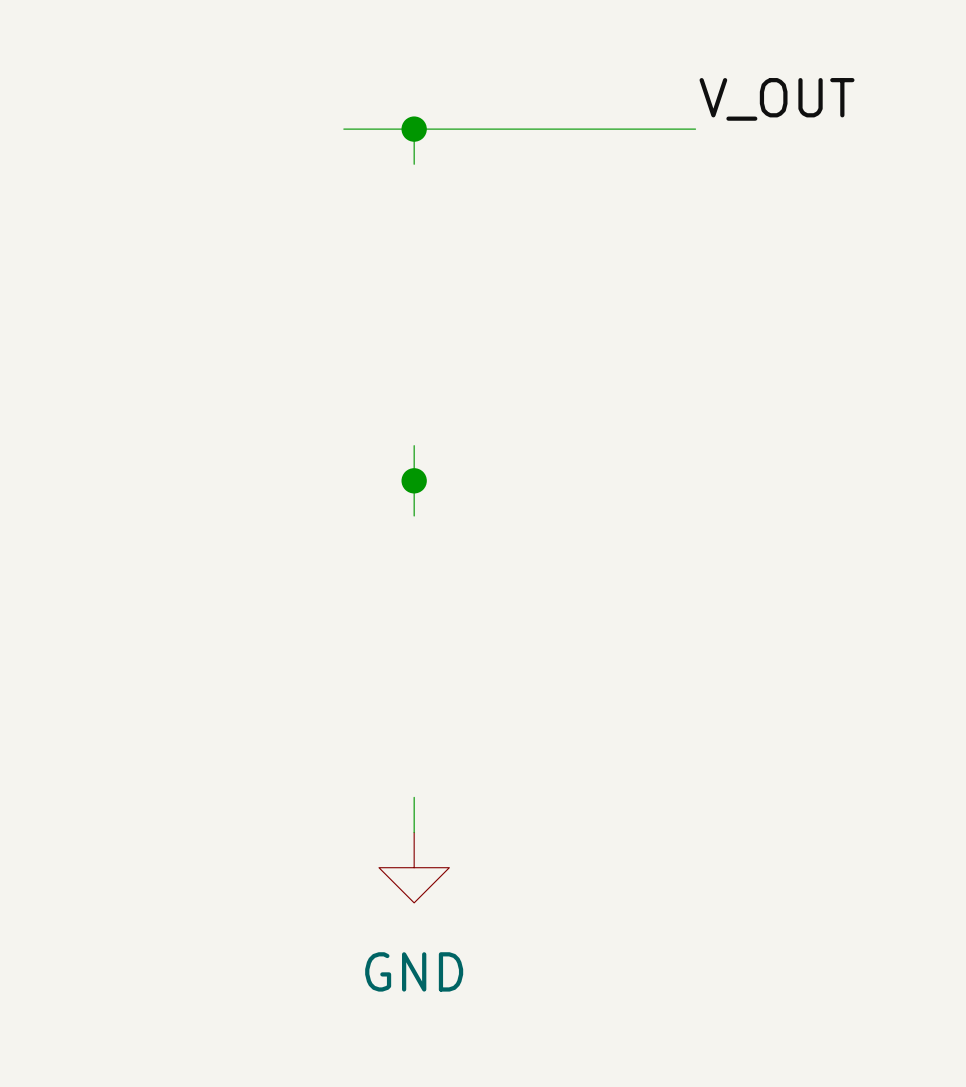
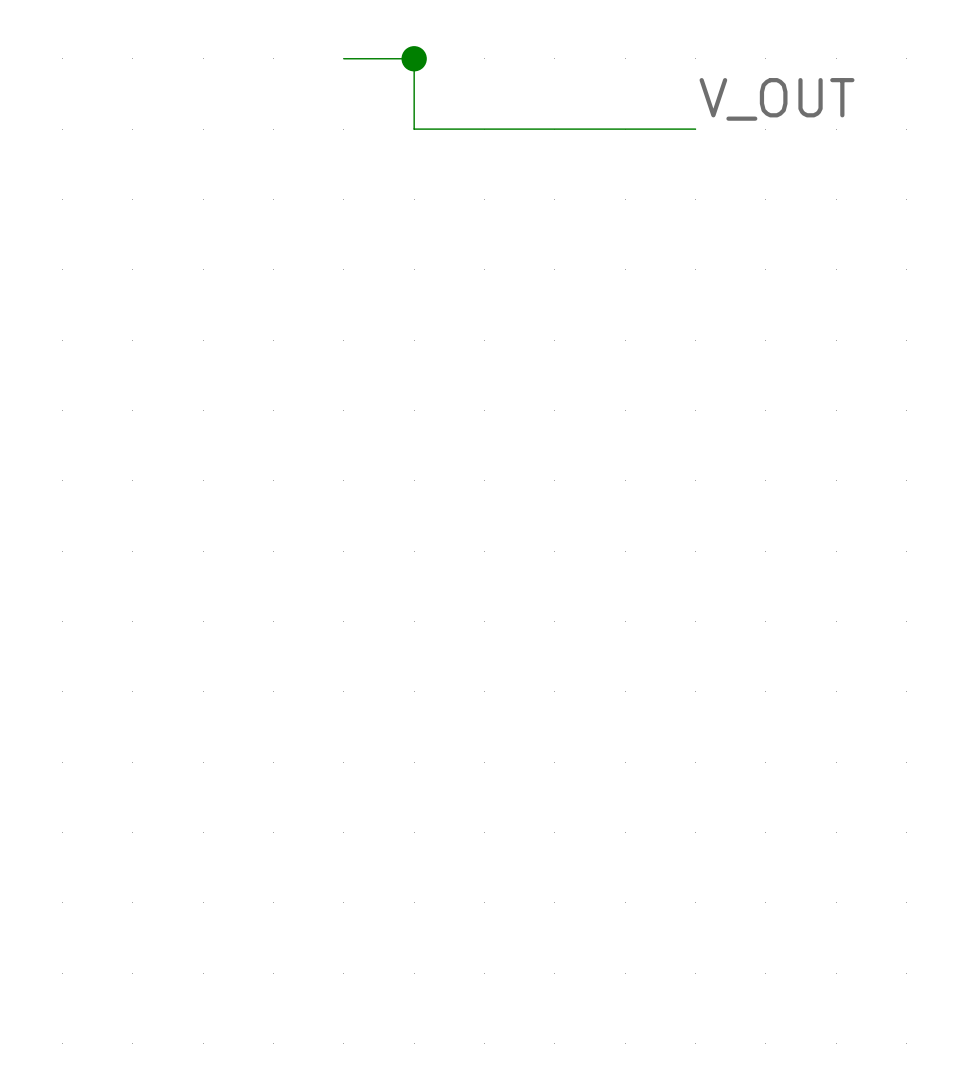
wire: none -> (343, 58) (414, 58) (414, 129)
wire: (343, 129) (414, 129) (414, 164) -> none
junction position: (414, 129) -> (414, 58)
wire: (414, 445) (414, 515) -> none
junction: (414, 480) -> none
wire: (414, 797) (414, 832) -> none
power symbol: GND (414, 867) -> none

